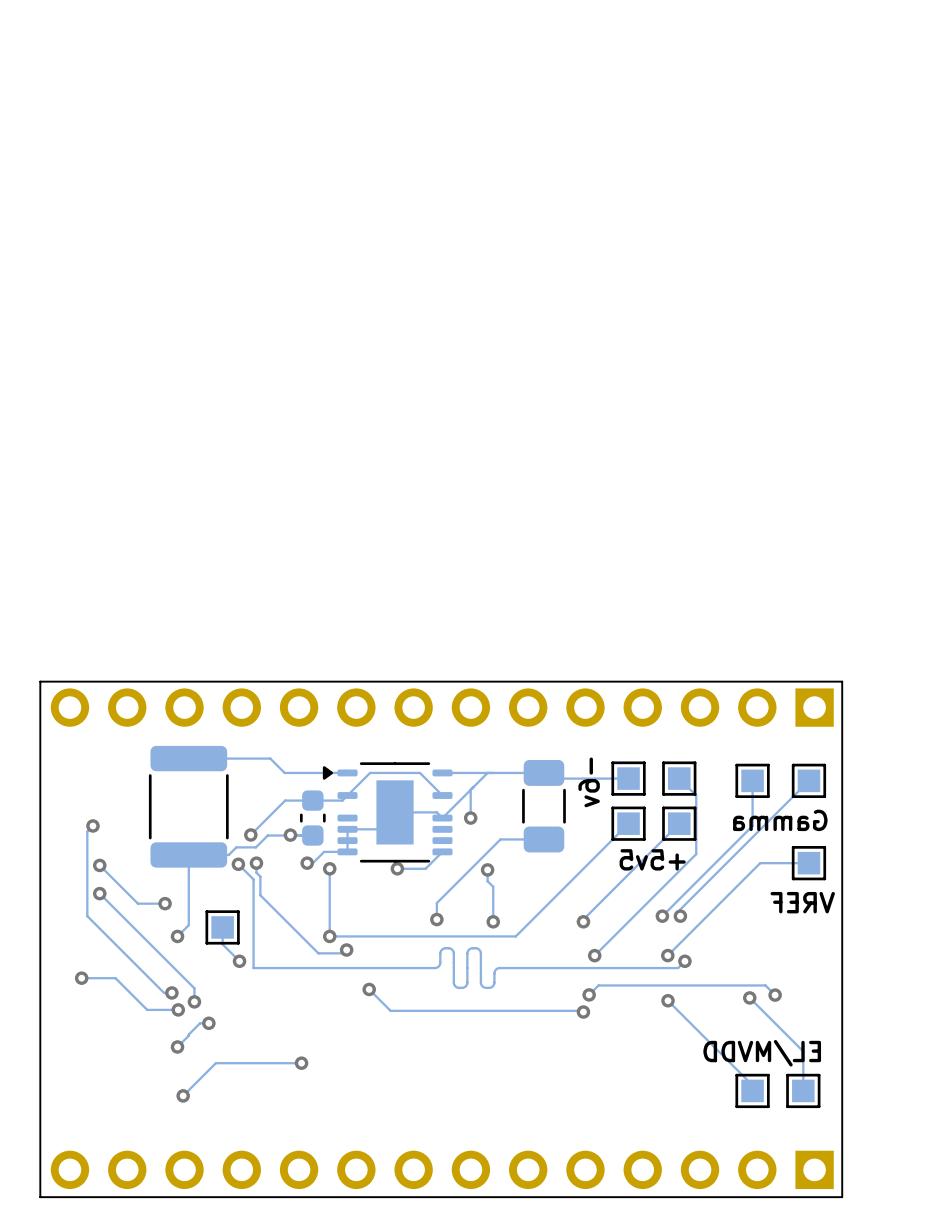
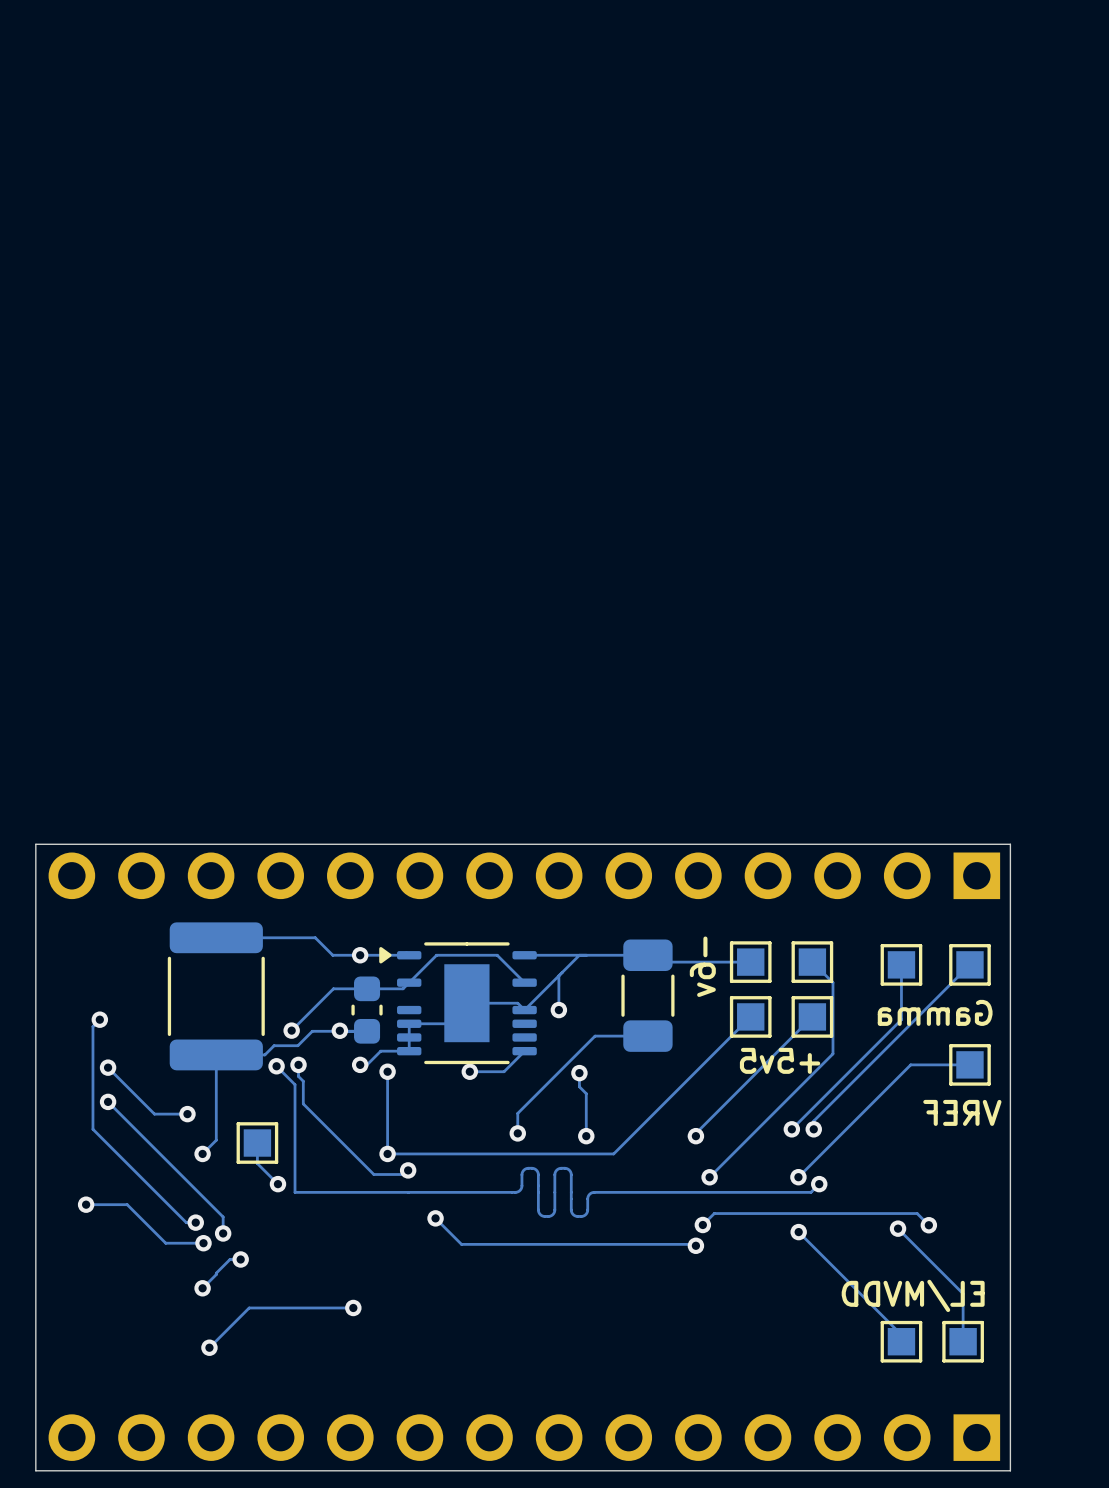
via: none -> (360, 955)

